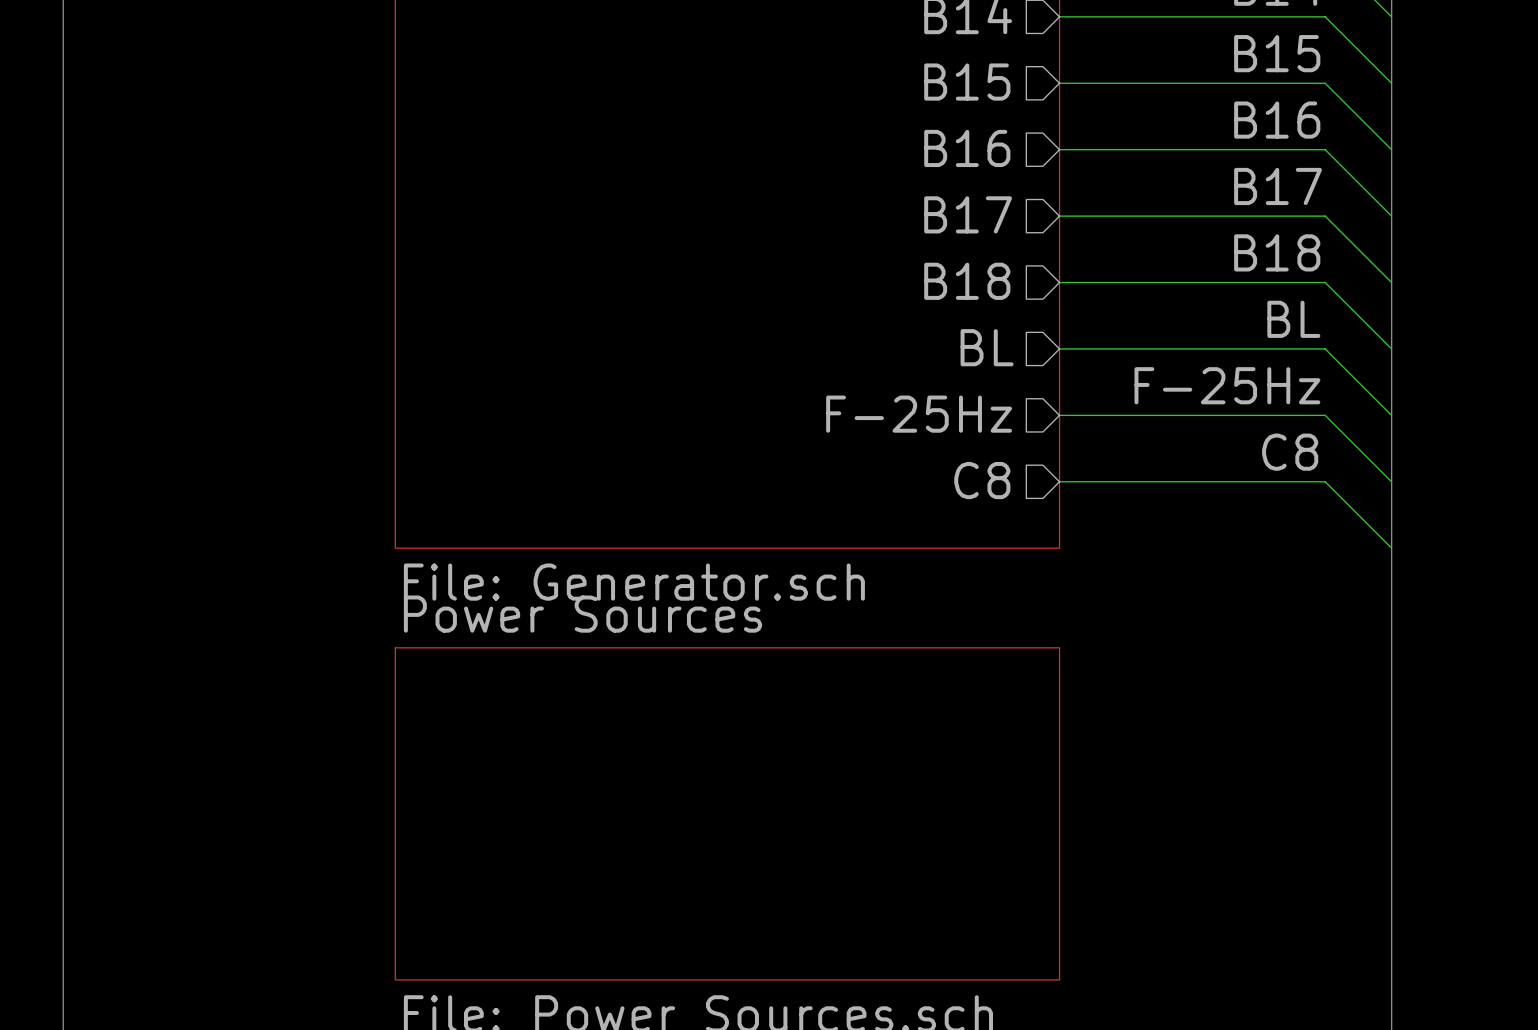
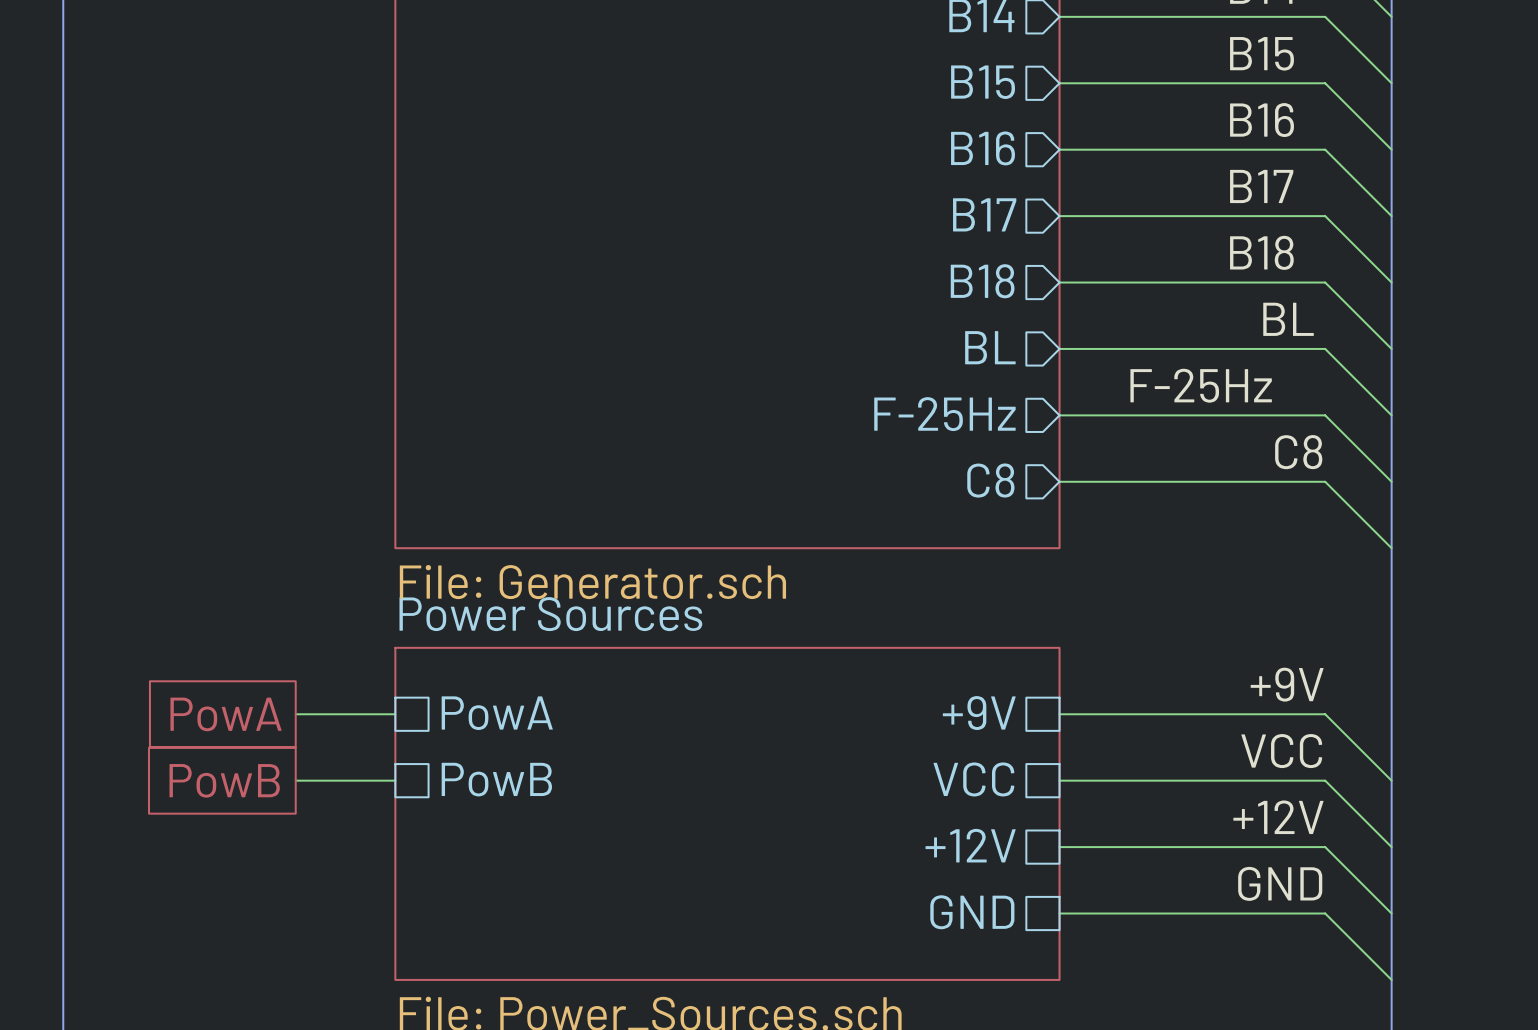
label: none -> +9V (1287, 684)
sheet pin: none -> PowA (497, 713)
sheet pin: none -> +9V (979, 713)
global label: none -> PowA (226, 714)
wire: none -> (295, 714) (395, 714)
wire: none -> (1059, 714) (1325, 714) (1391, 780)
label: none -> VCC (1281, 751)
sheet pin: none -> PowB (496, 779)
sheet pin: none -> VCC (973, 779)
global label: none -> PowB (224, 780)
wire: none -> (295, 780) (395, 780)
wire: none -> (1059, 780) (1325, 780) (1391, 847)
label: none -> +12V (1278, 817)
sheet pin: none -> +12V (970, 845)
wire: none -> (1059, 847) (1325, 847) (1391, 913)
label: none -> GND (1280, 883)
sheet pin: none -> GND (972, 912)
wire: none -> (1059, 913) (1325, 913) (1391, 979)

